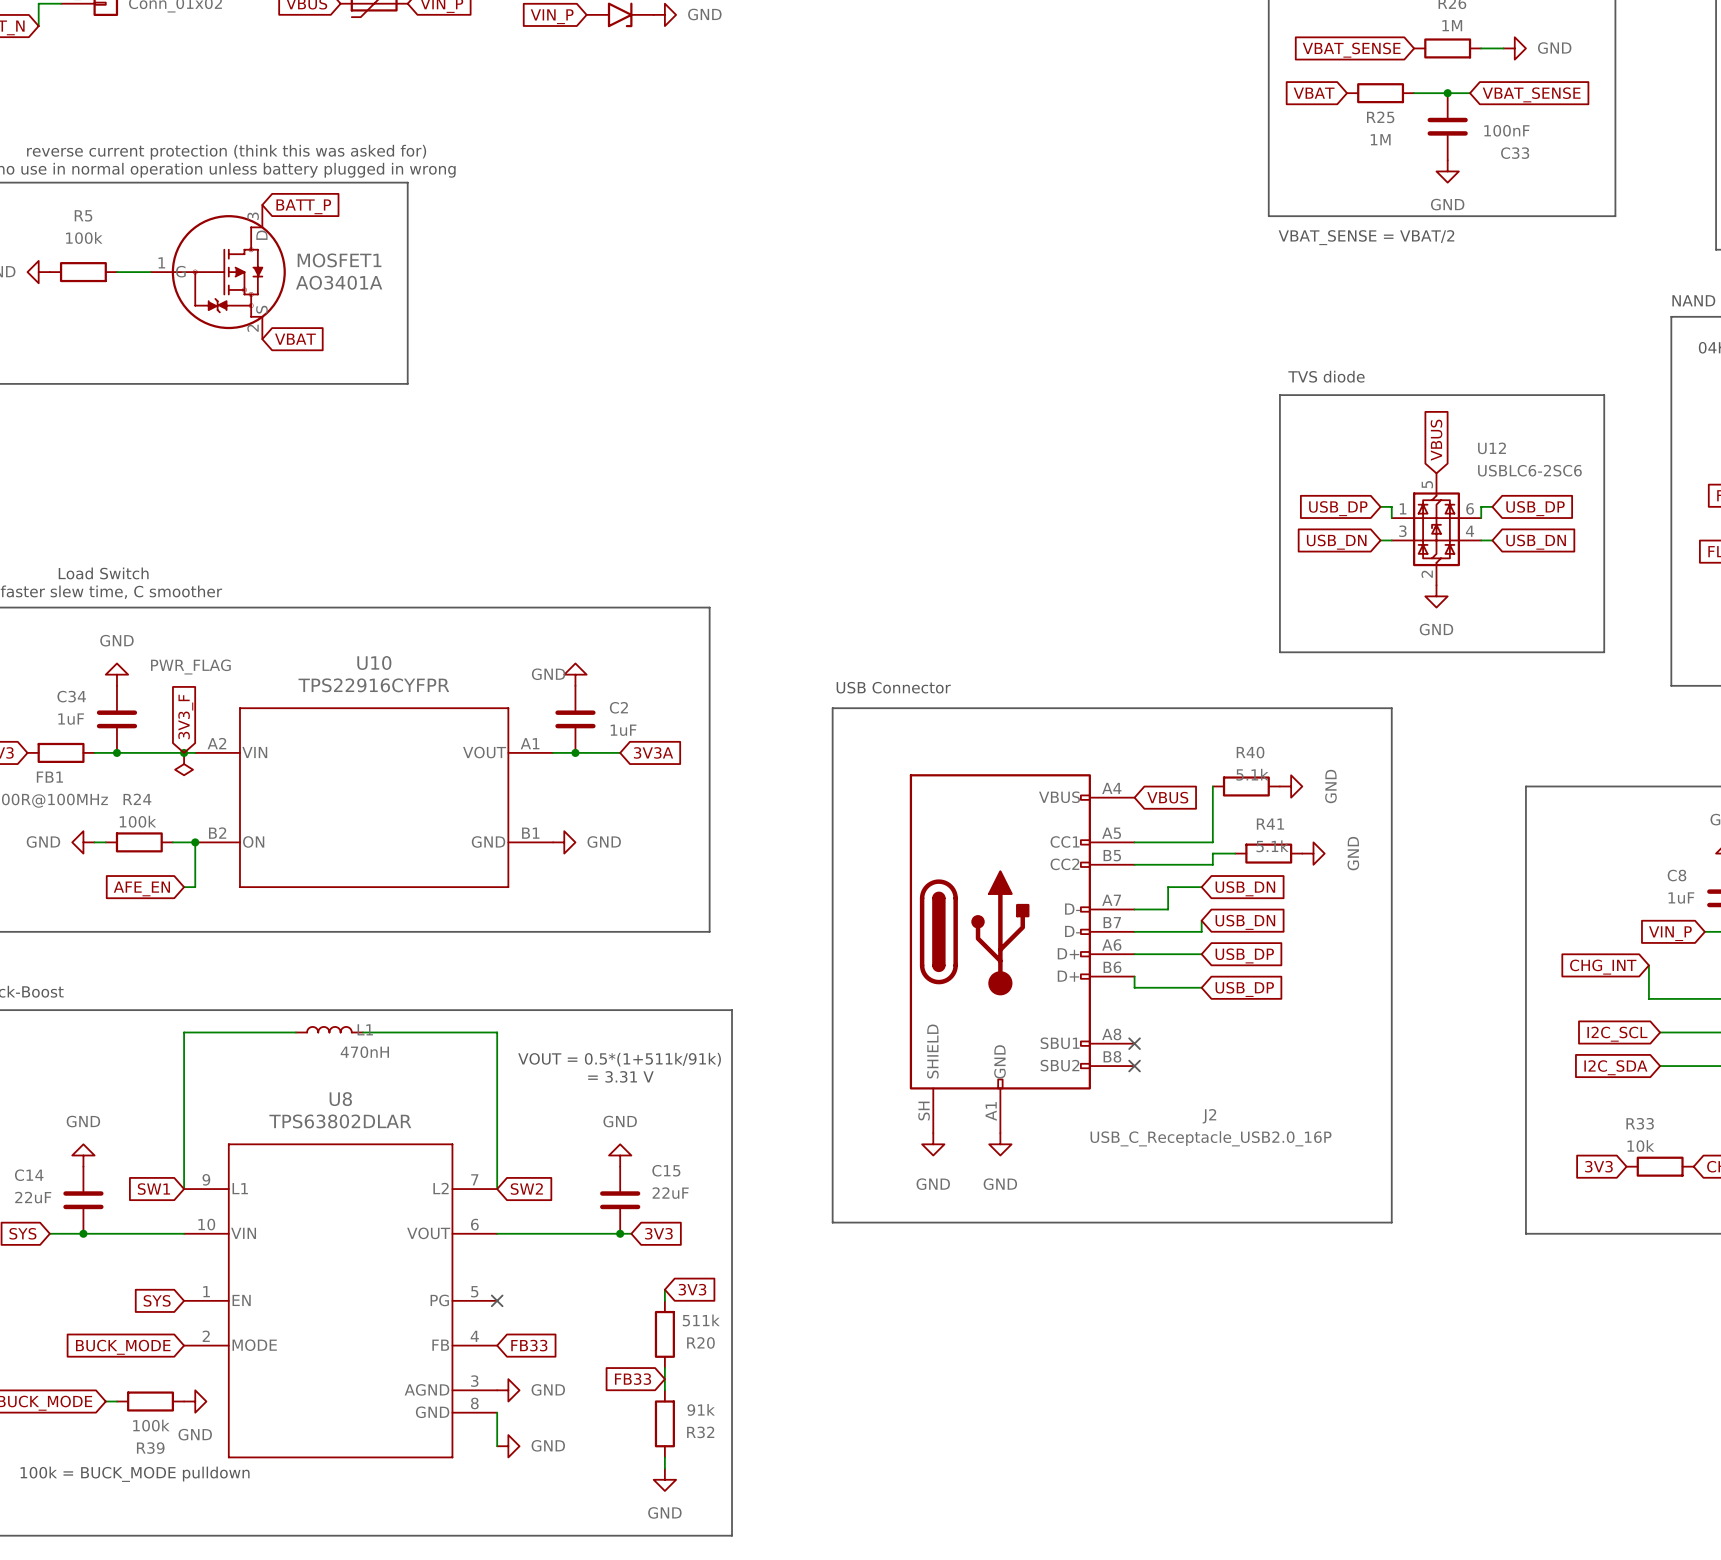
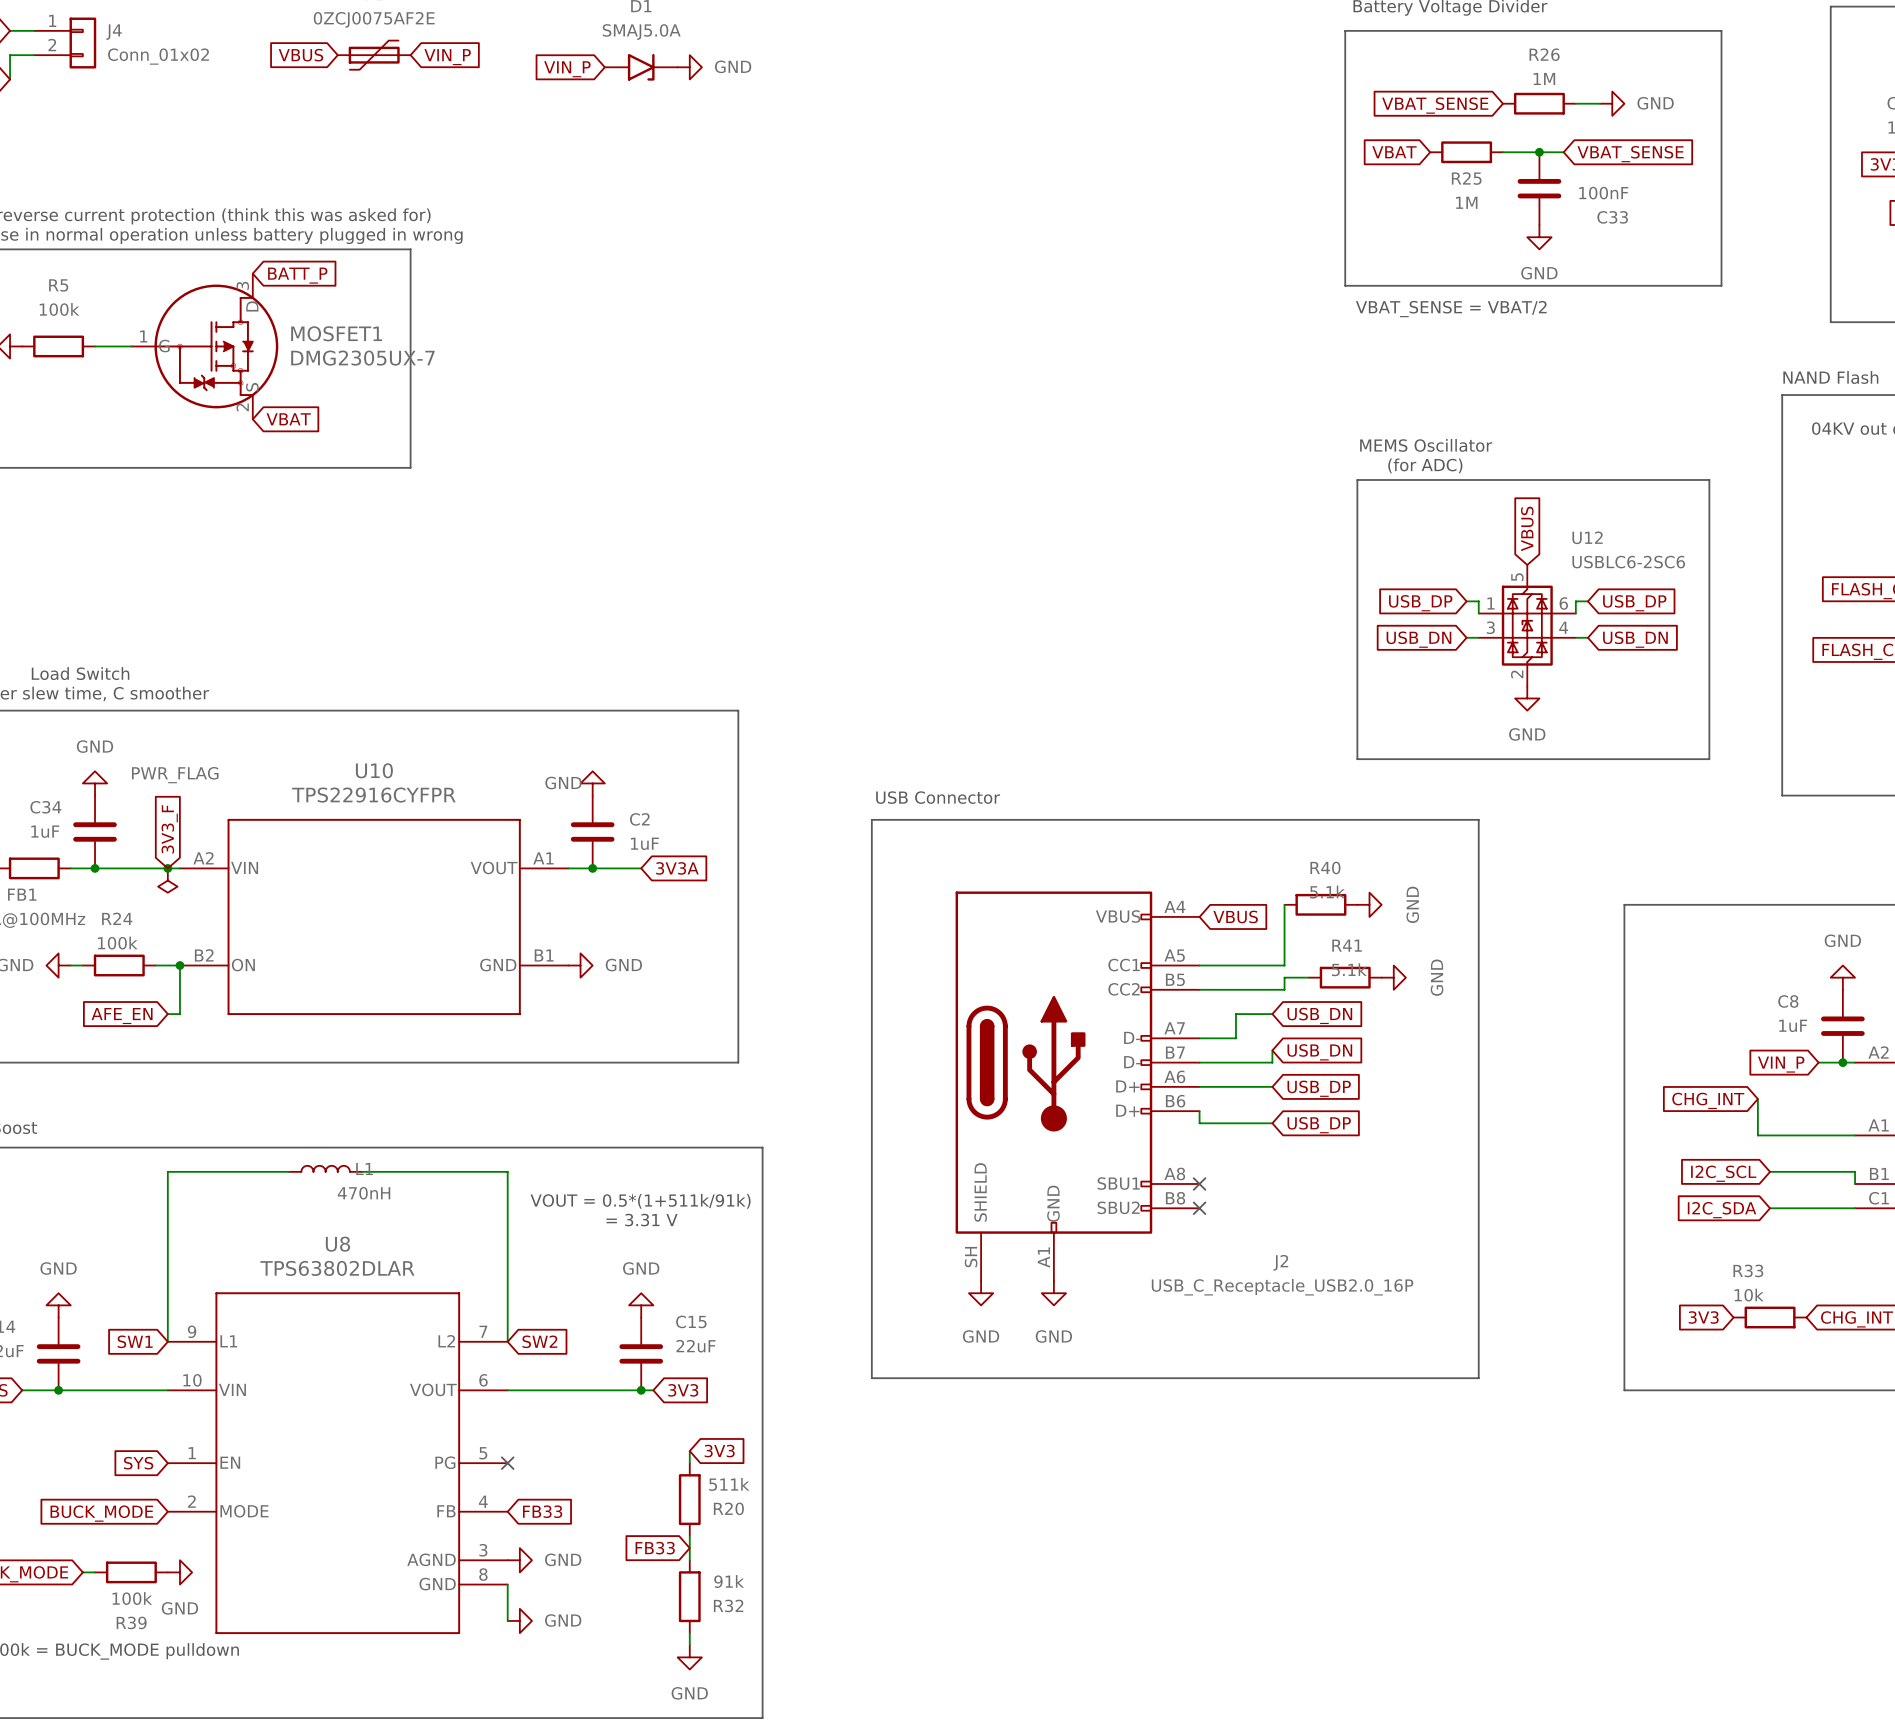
MOSFET1 value: AO3401A (339, 282) -> DMG2305UX-7 (362, 358)
text: none -> MEMS Oscillator (1426, 445)
text: TVS diode (1326, 376) -> none
text: none -> (for ADC) (1425, 465)

